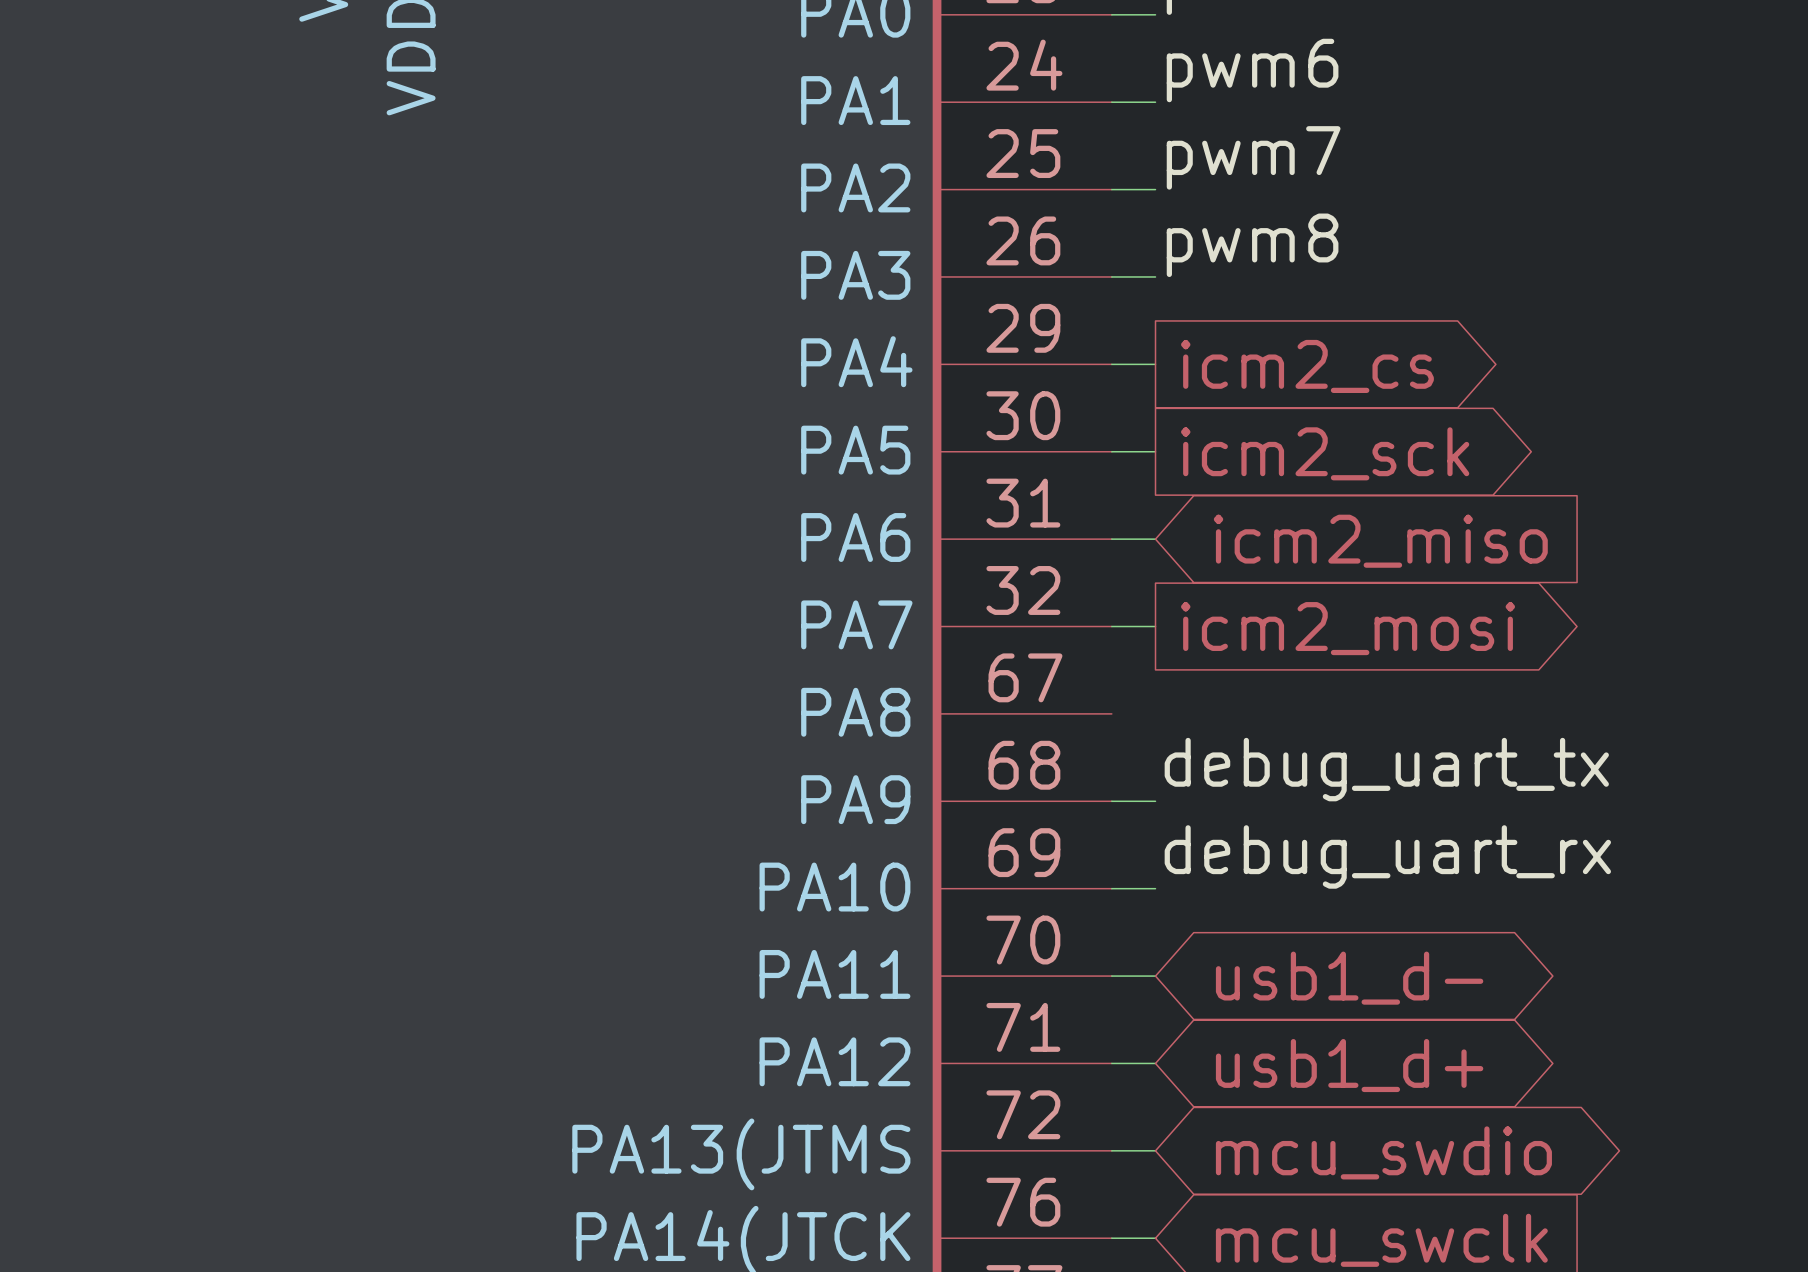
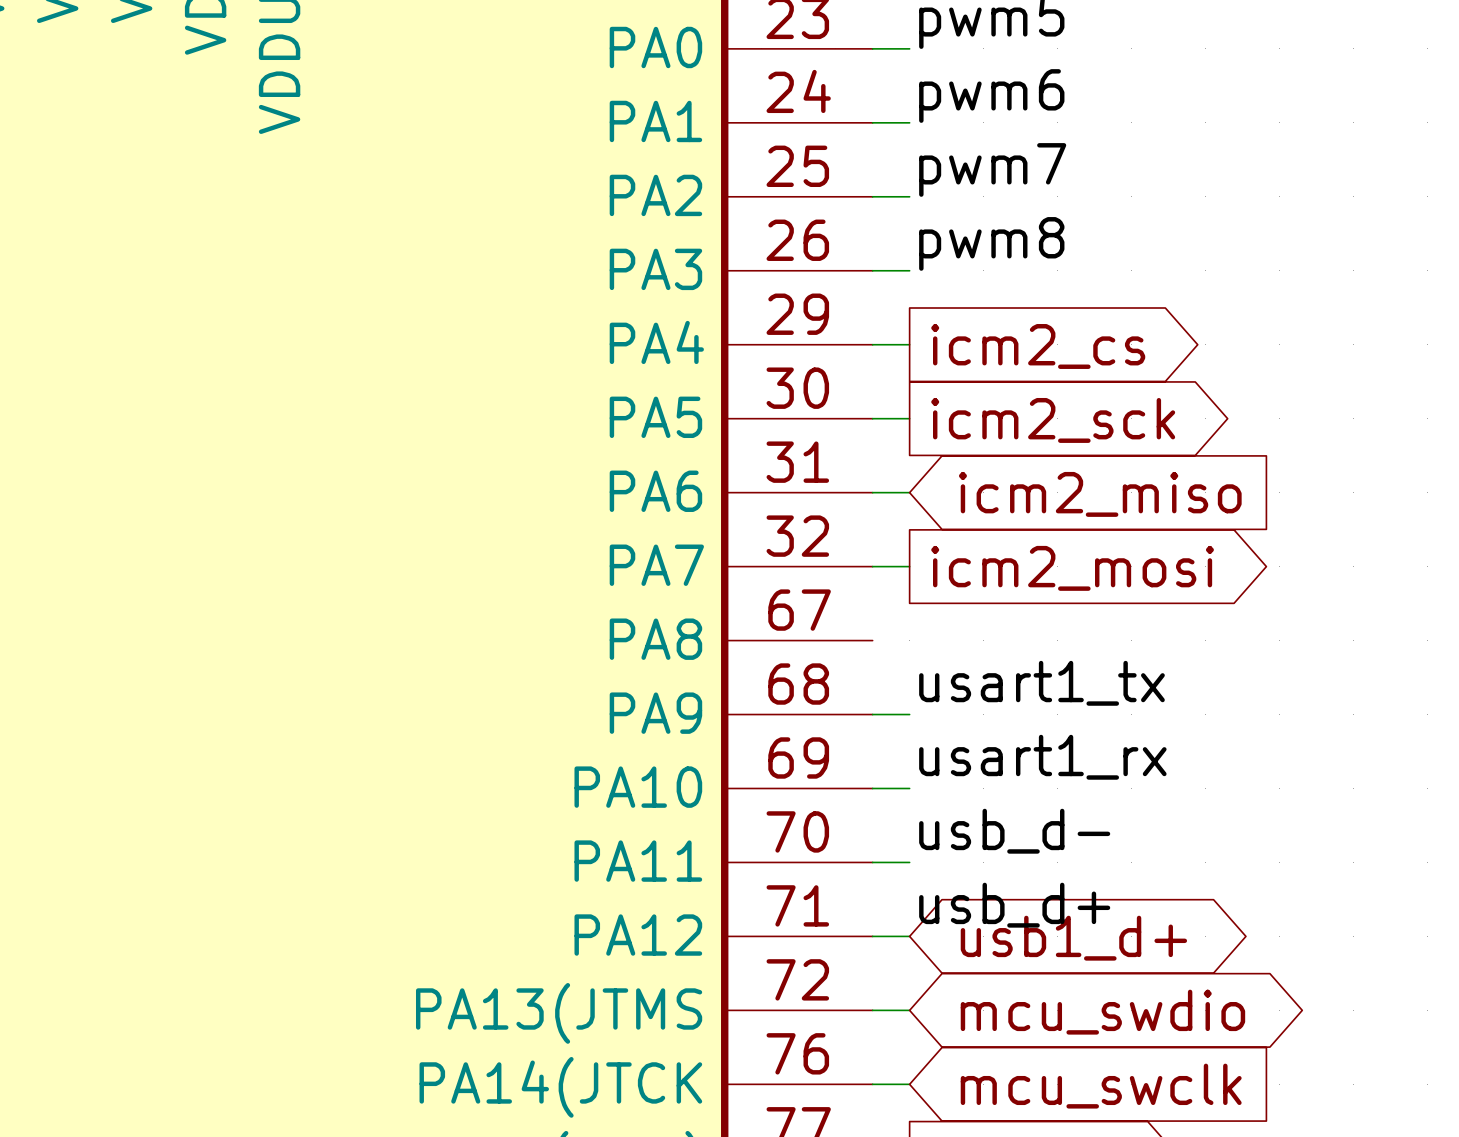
label: debug_uart_tx (1386, 769) -> usart1_tx (1041, 683)
label: debug_uart_rx (1387, 856) -> usart1_rx (1042, 757)
label: none -> usb_d- (1014, 831)
global label: usb1_d- (1349, 978) -> none
label: none -> usb_d+ (1014, 905)

